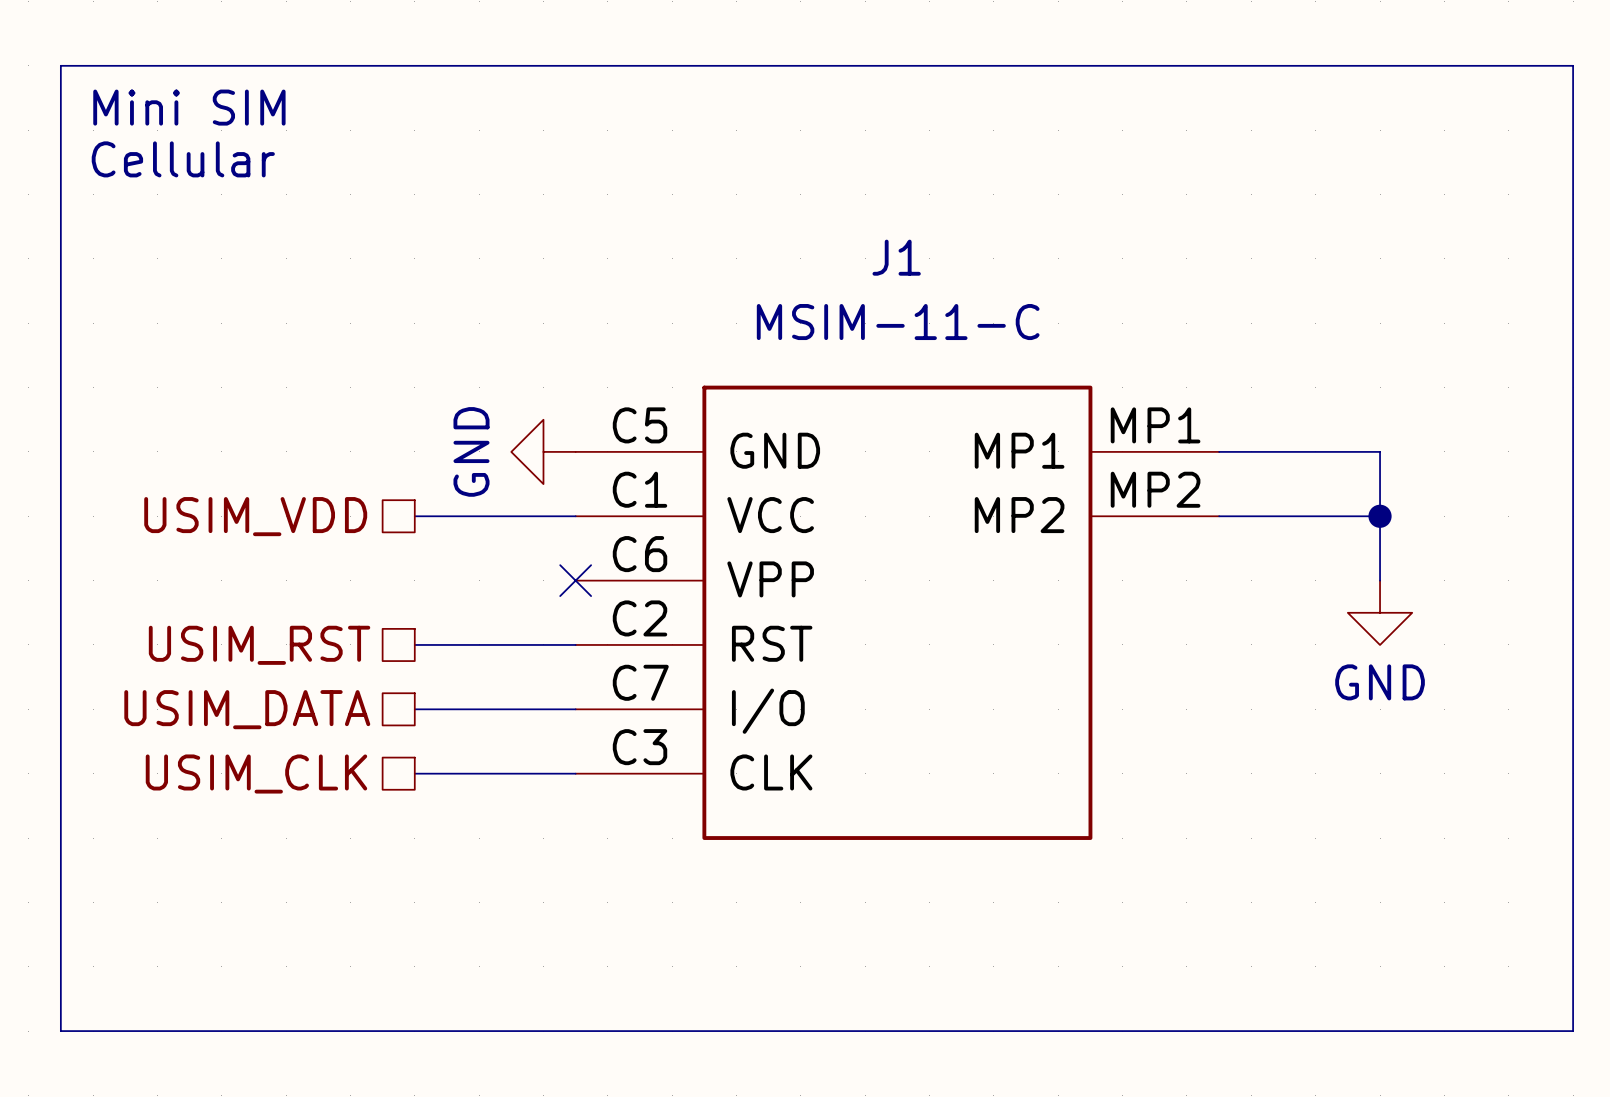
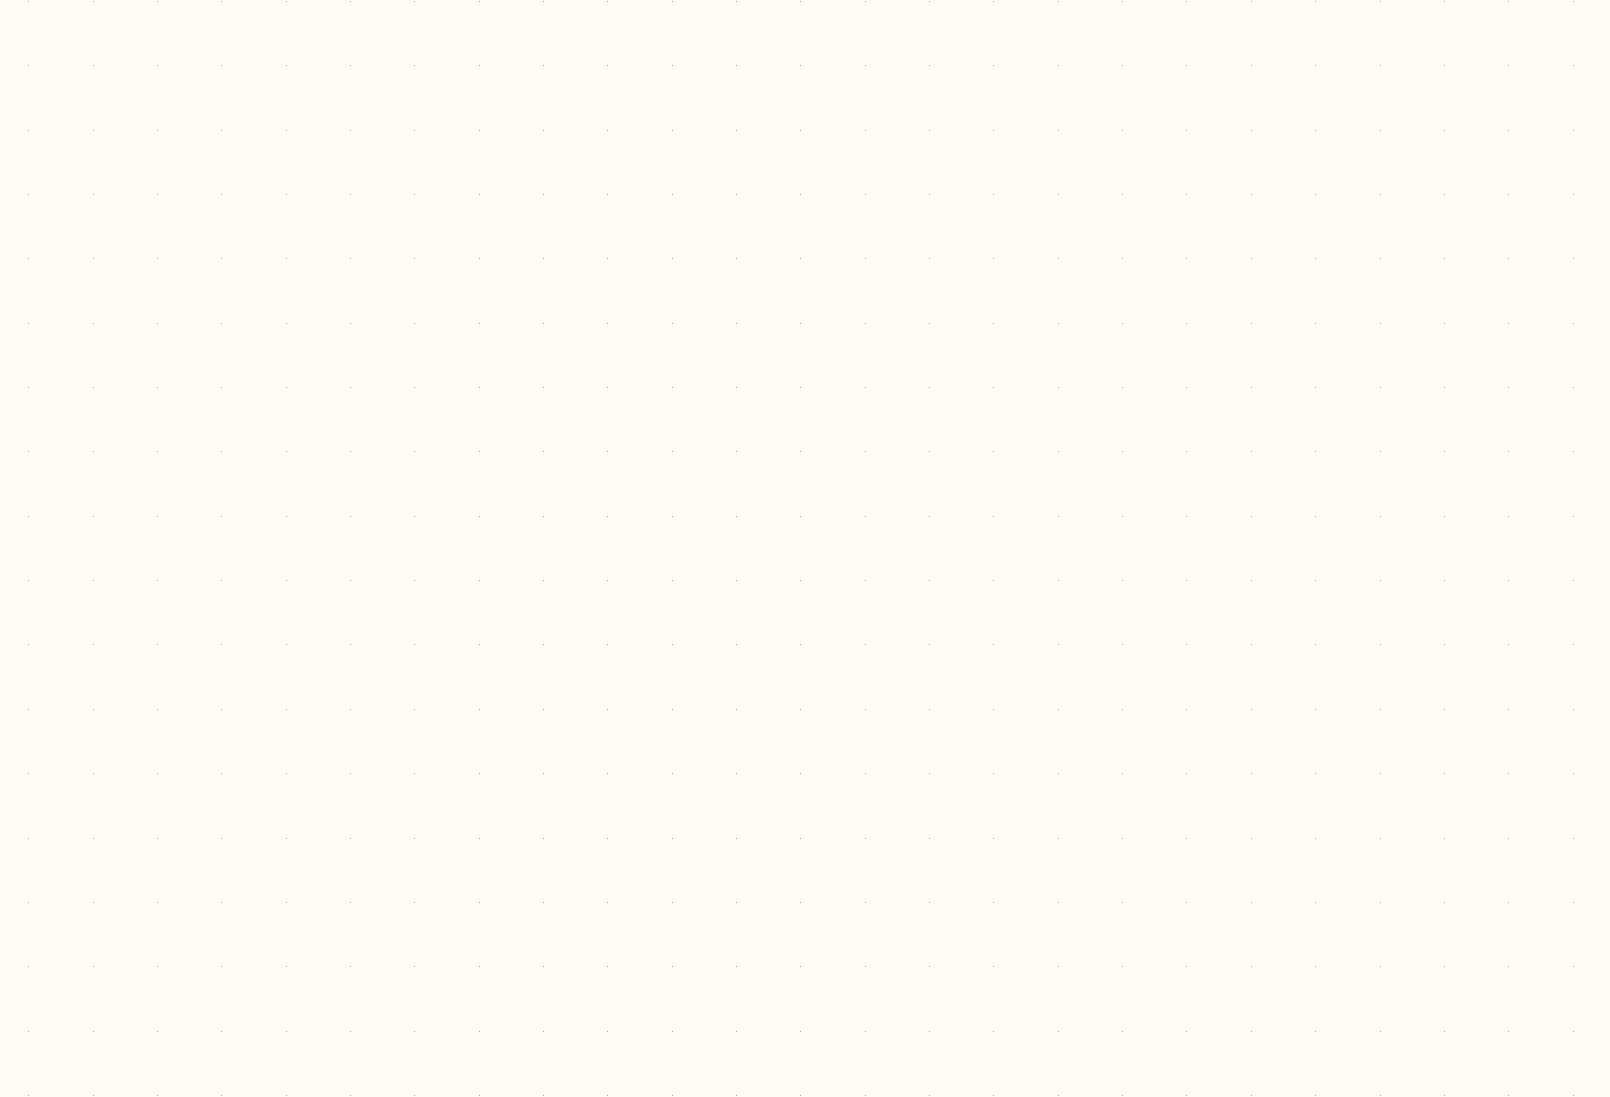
line: (60, 65) (1573, 65) (1573, 1031) (60, 1031) (60, 65) -> none
text: Mini SIM (189, 107) -> none
text: Cellular (183, 159) -> none
power symbol: GND (543, 451) -> none
wire: (1219, 451) (1380, 451) (1380, 580) -> none
hierarchical label: USIM_VDD (255, 516) -> none
wire: (414, 516) (575, 516) -> none
wire: (1219, 516) (1380, 516) -> none
junction: (1380, 516) -> none
no-connect mark: (575, 580) -> none
J1: MSIM-11-C (897, 612) -> none
power symbol: GND (1380, 612) -> none
wire: (414, 644) (575, 644) -> none
hierarchical label: USIM_RST (259, 645) -> none
hierarchical label: USIM_DATA (247, 709) -> none
wire: (414, 709) (575, 709) -> none
wire: (414, 773) (575, 773) -> none
hierarchical label: USIM_CLK (256, 774) -> none

